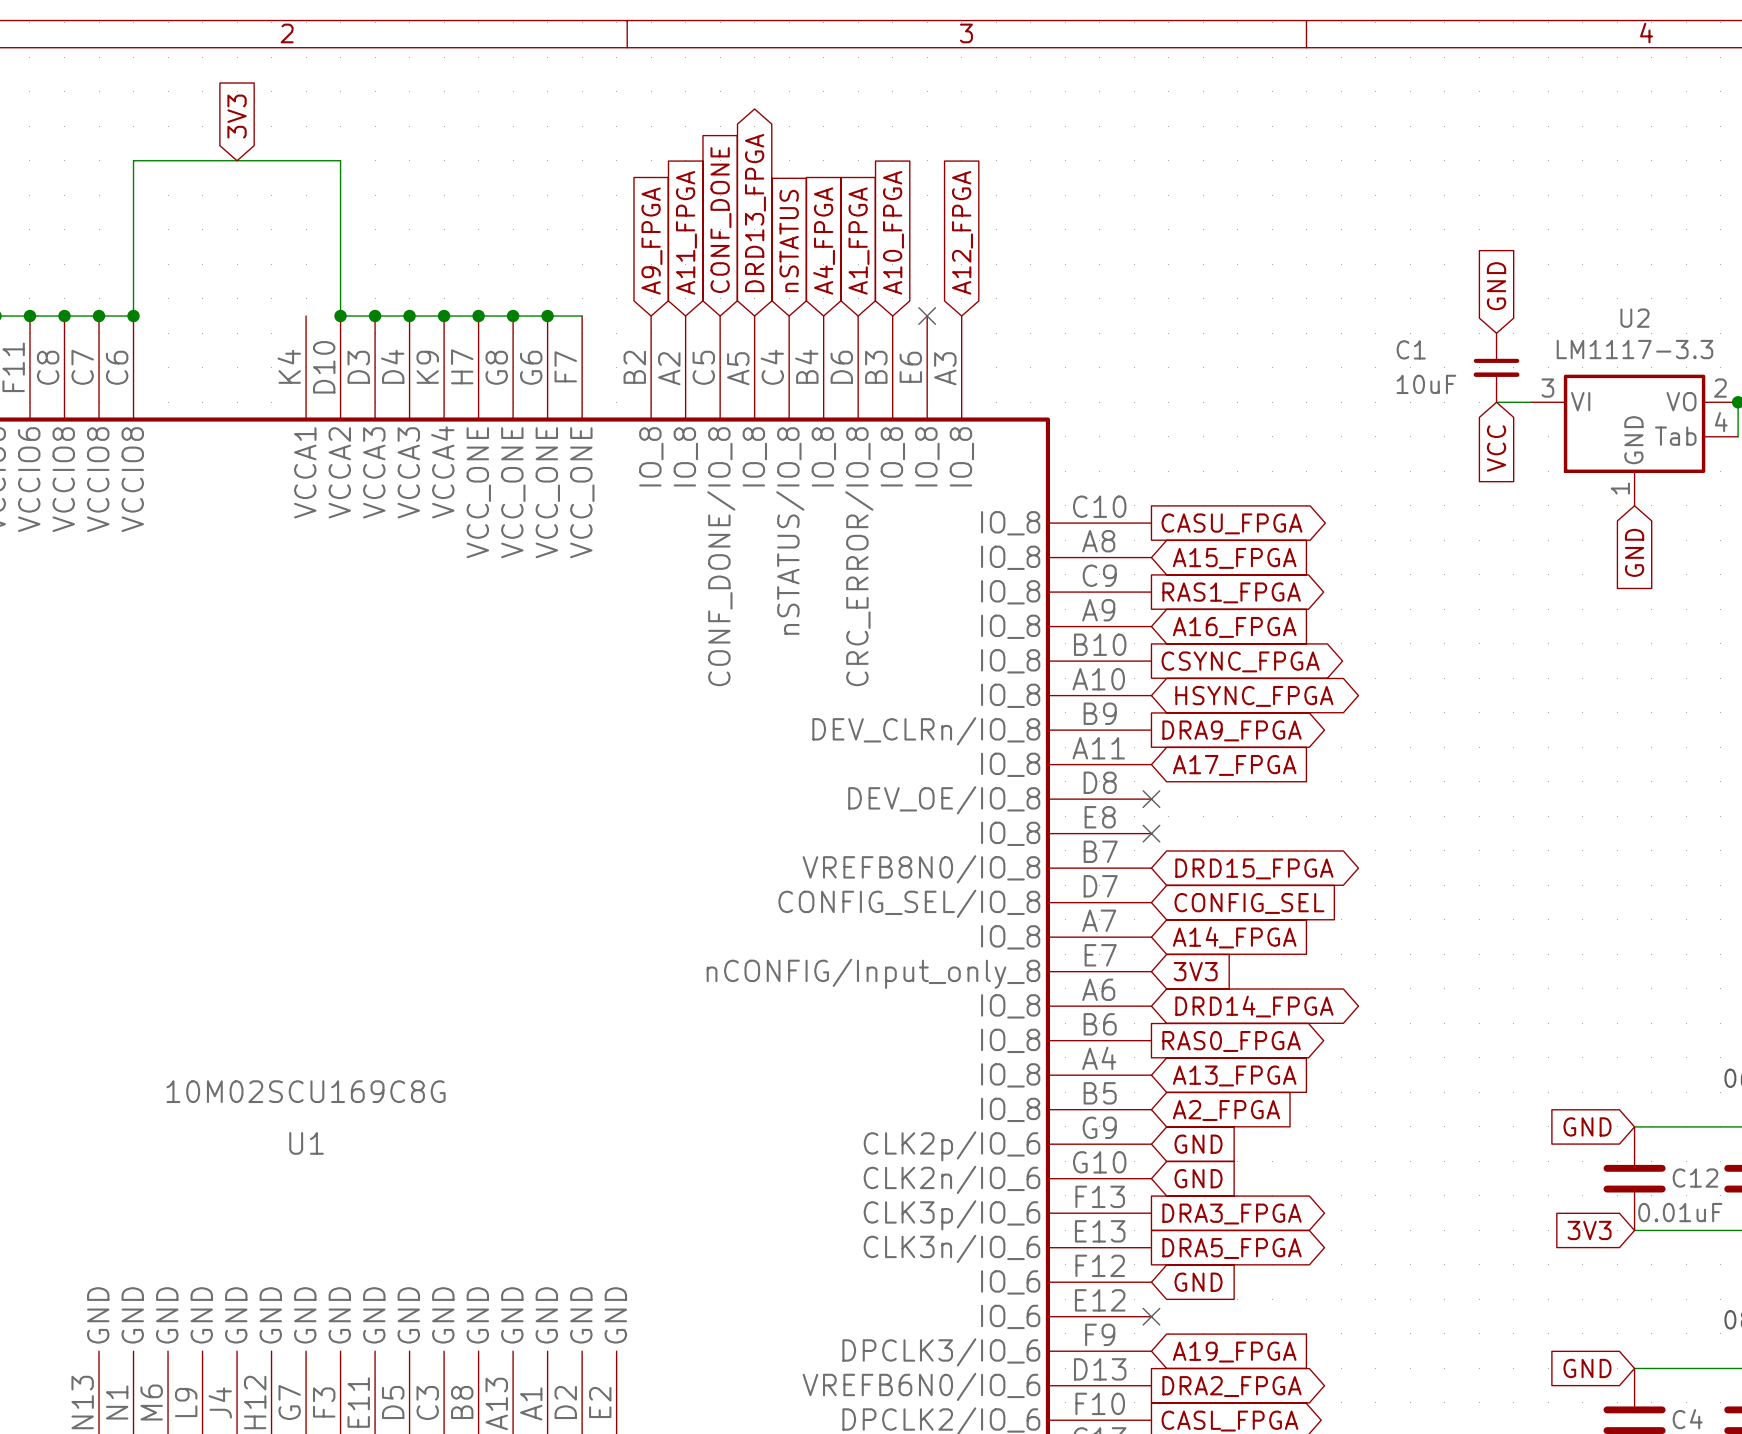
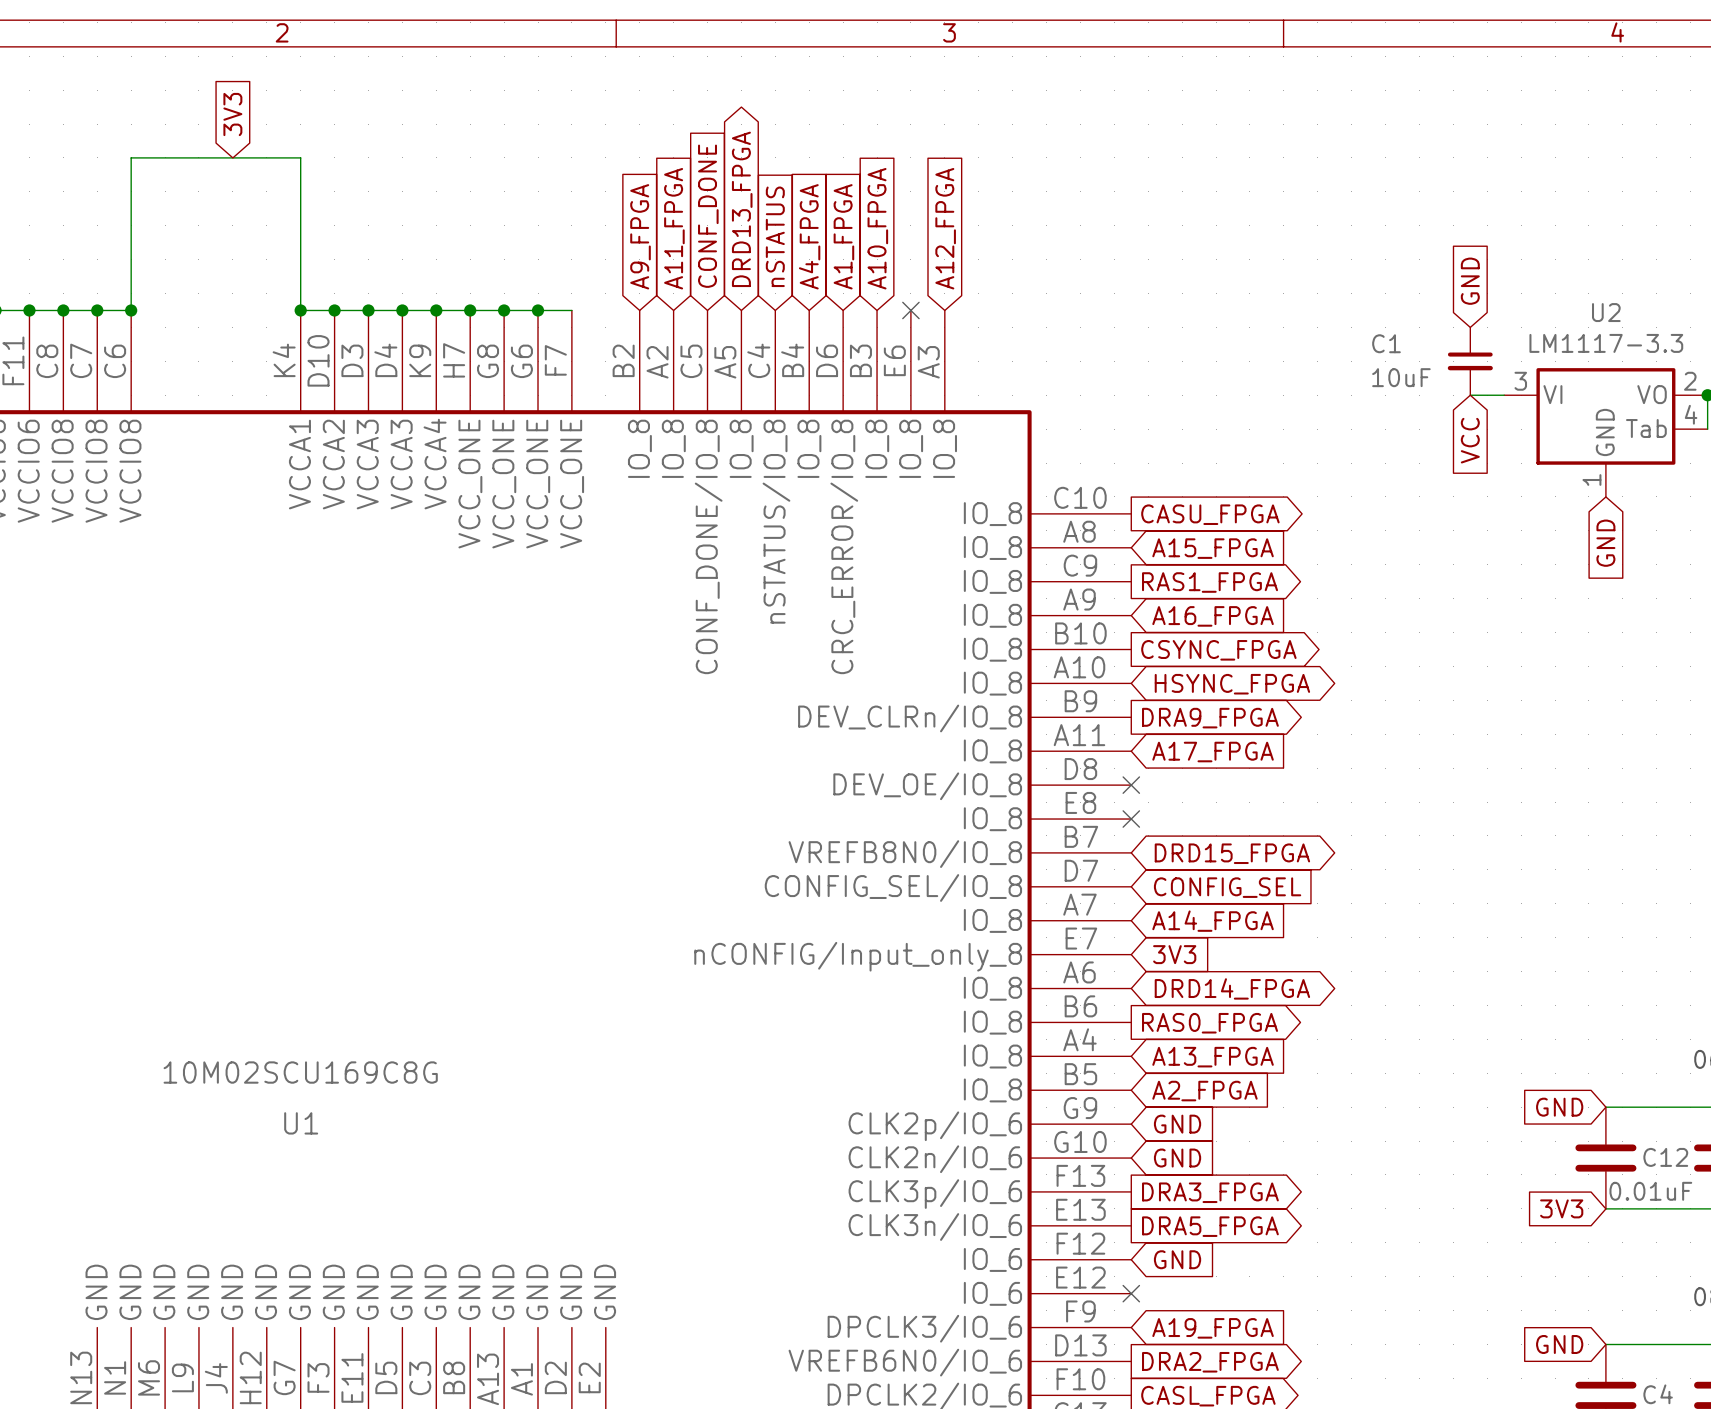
wire: (306, 160) (340, 160) (340, 316) -> (300, 157) (300, 310) (334, 310)
junction: none -> (300, 310)

